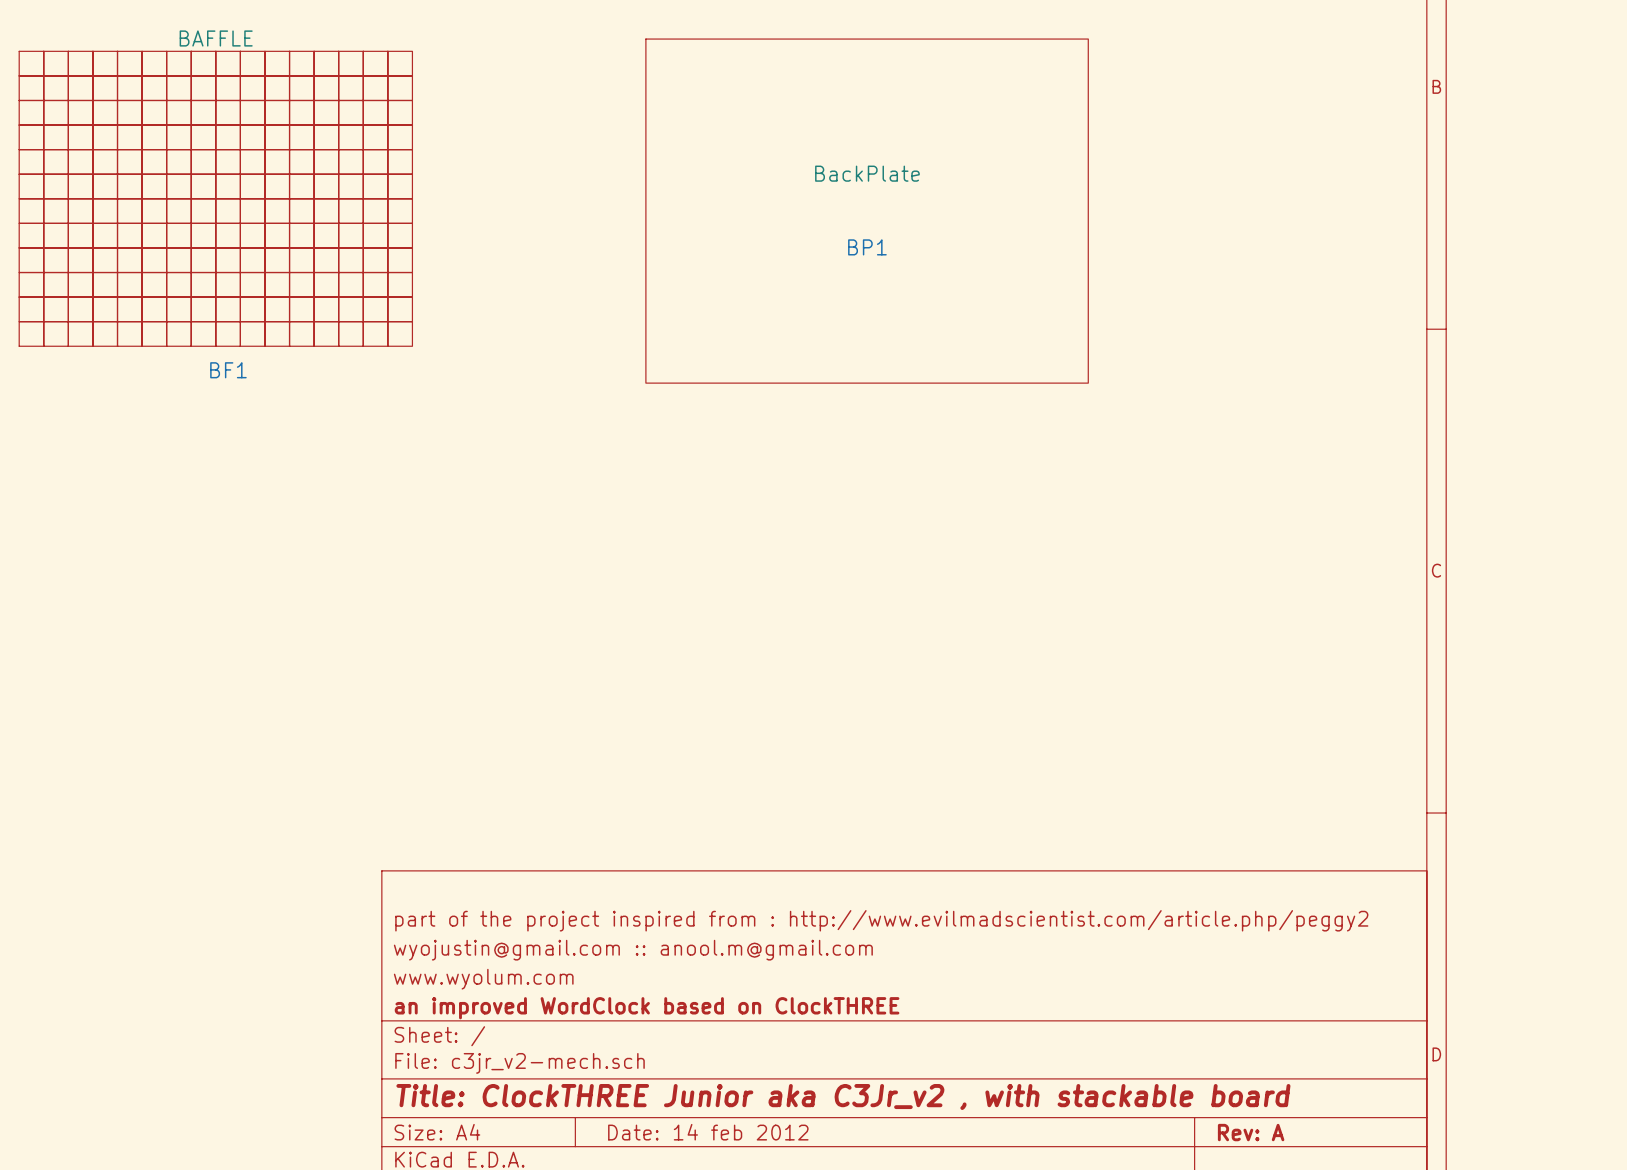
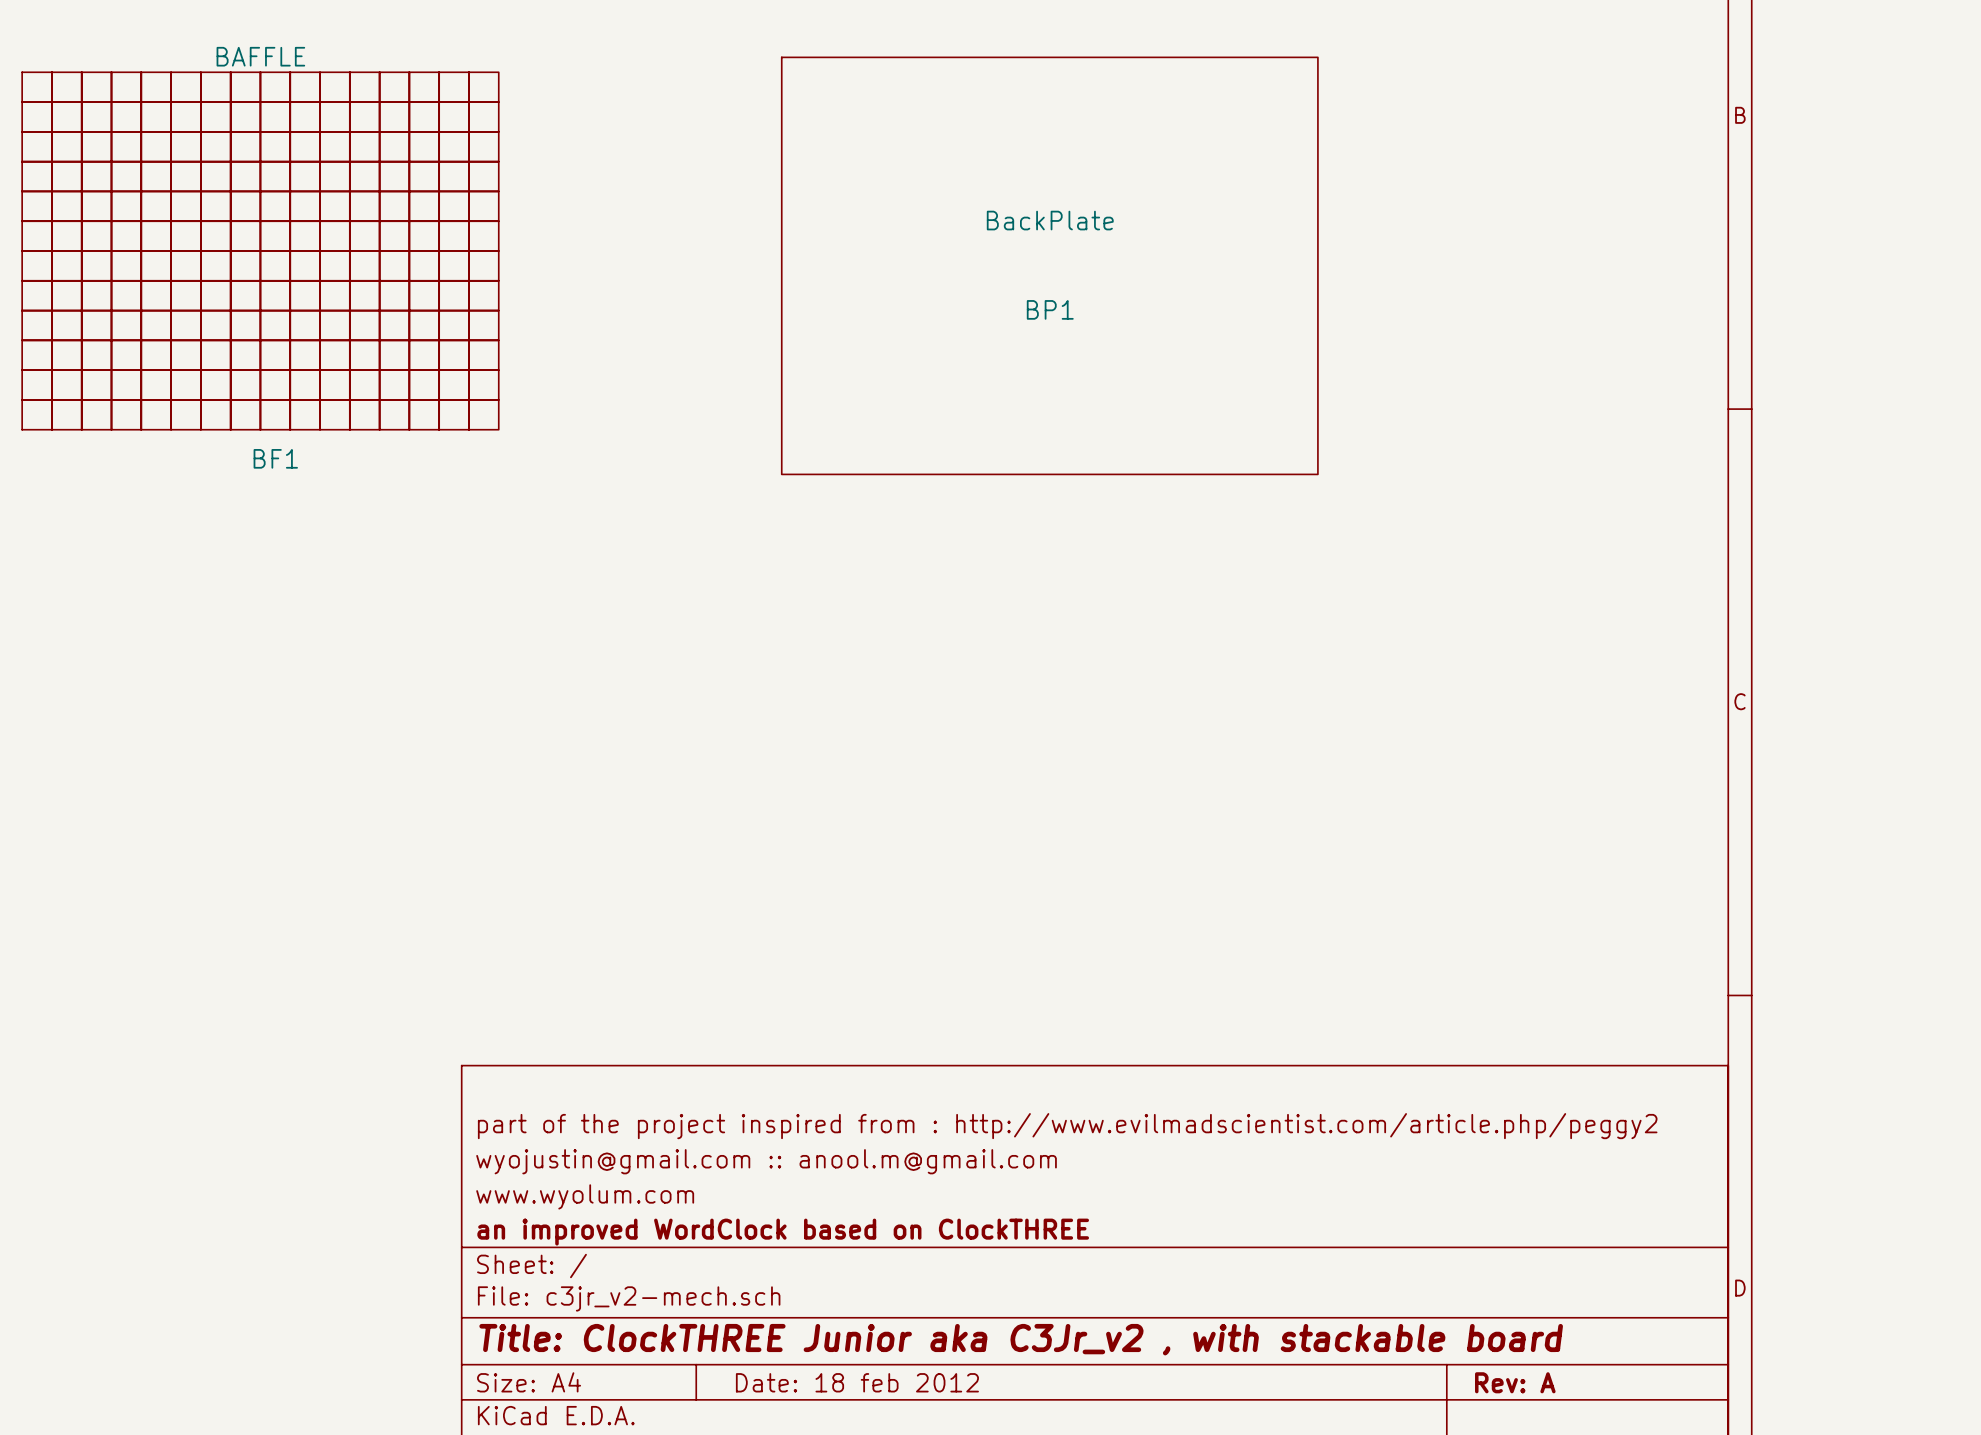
title block: Date: 14 feb 2012 (708, 1132) -> Date: 18 feb 2012 (857, 1382)

